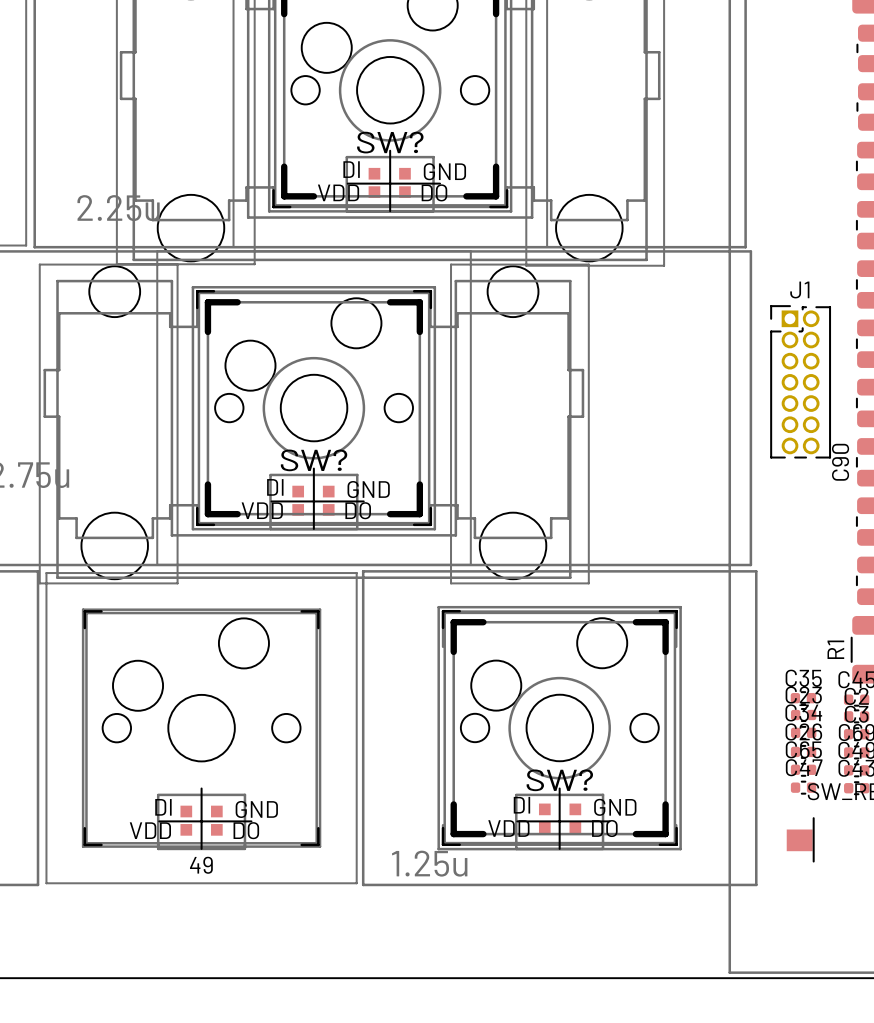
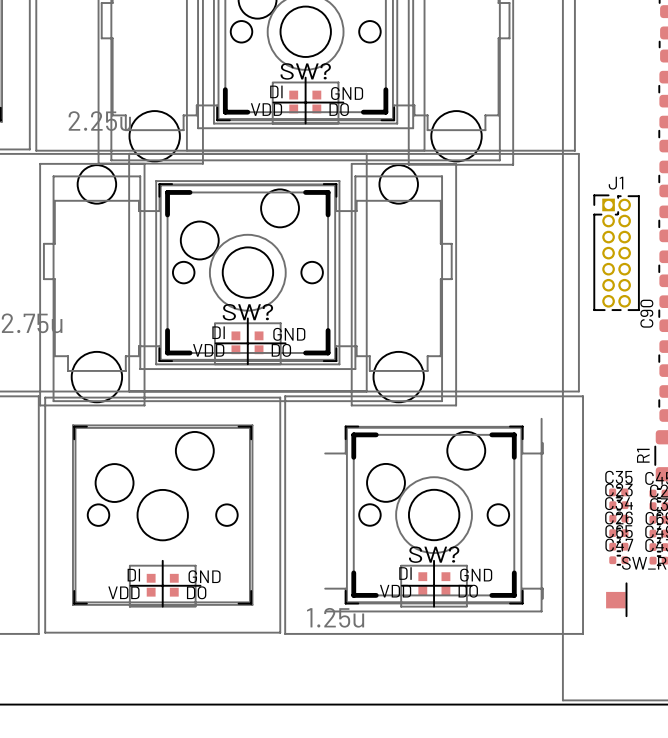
part footprint: [361, 570, 758, 887] -> [284, 395, 584, 635]
part value: 49 (201, 865) -> none

